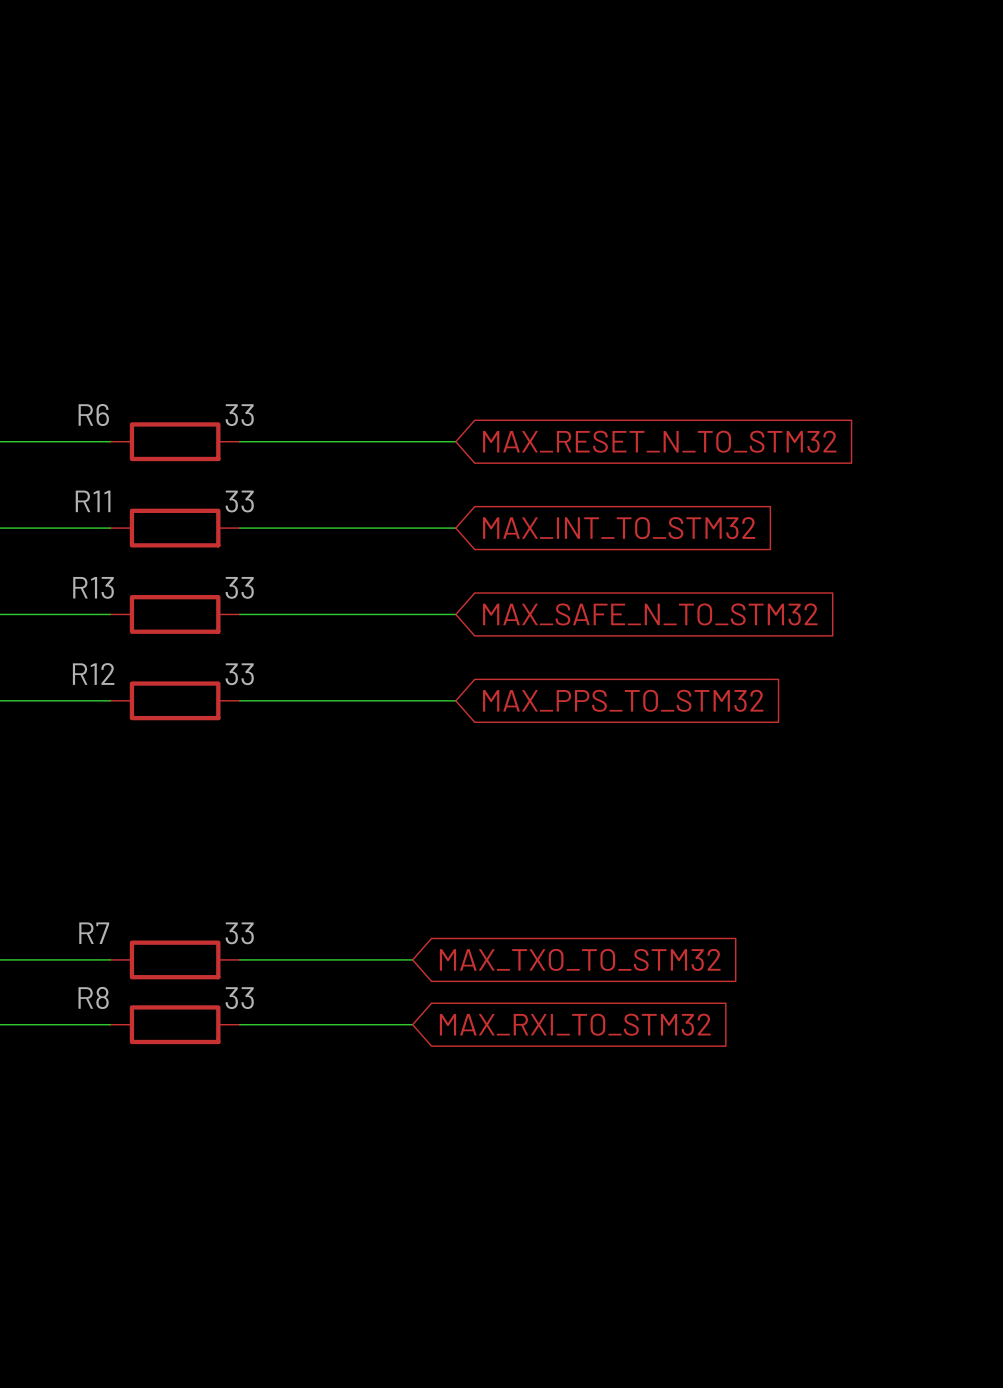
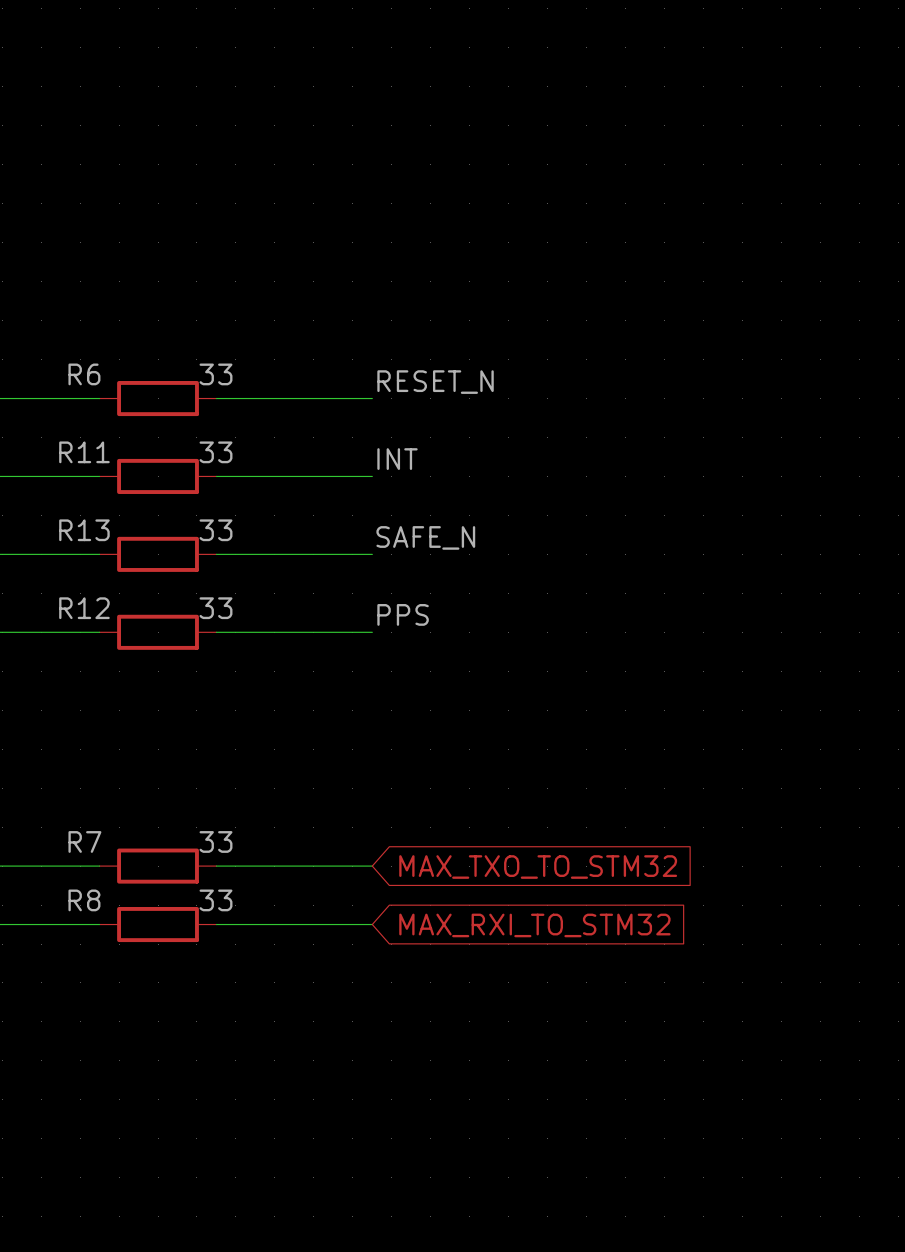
label: none -> RESET_N (435, 382)
wire: (412, 441) (455, 441) -> none
global label: MAX_RESET_N_TO_STM32 (659, 441) -> none
label: none -> INT (397, 459)
wire: (412, 528) (455, 528) -> none
global label: MAX_INT_TO_STM32 (619, 528) -> none
label: none -> SAFE_N (425, 537)
wire: (412, 614) (455, 614) -> none
global label: MAX_SAFE_N_TO_STM32 (650, 614) -> none
label: none -> PPS (403, 614)
wire: (412, 700) (455, 700) -> none
global label: MAX_PPS_TO_STM32 (623, 700) -> none

